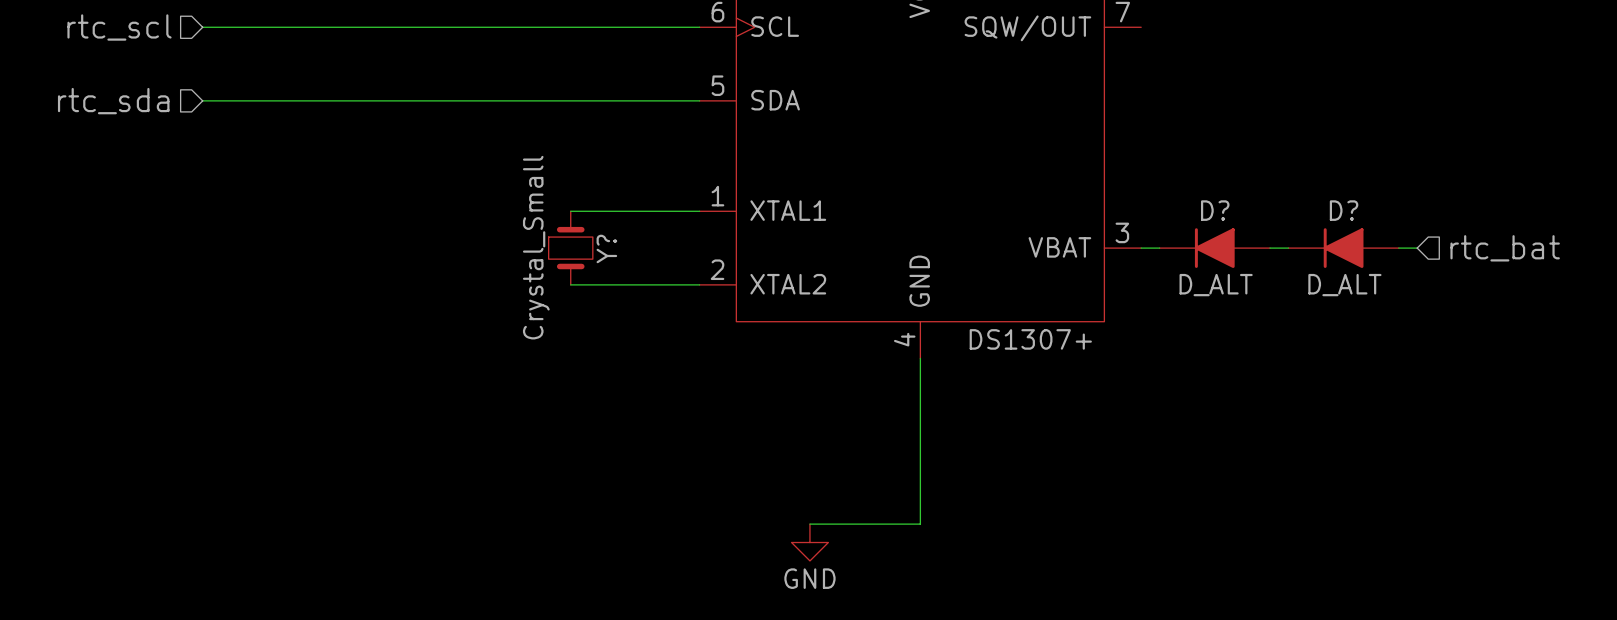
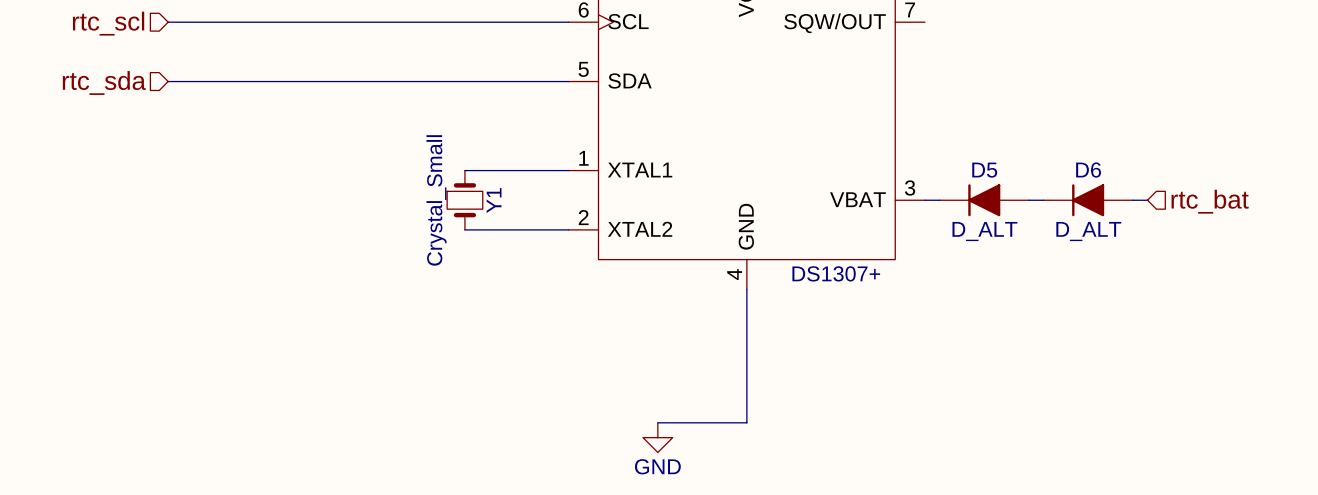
D? name: D? (1215, 210) -> D5 (984, 170)
D? name: D? (1344, 210) -> D6 (1088, 170)
Y? name: Y? (606, 248) -> Y1 (494, 200)

